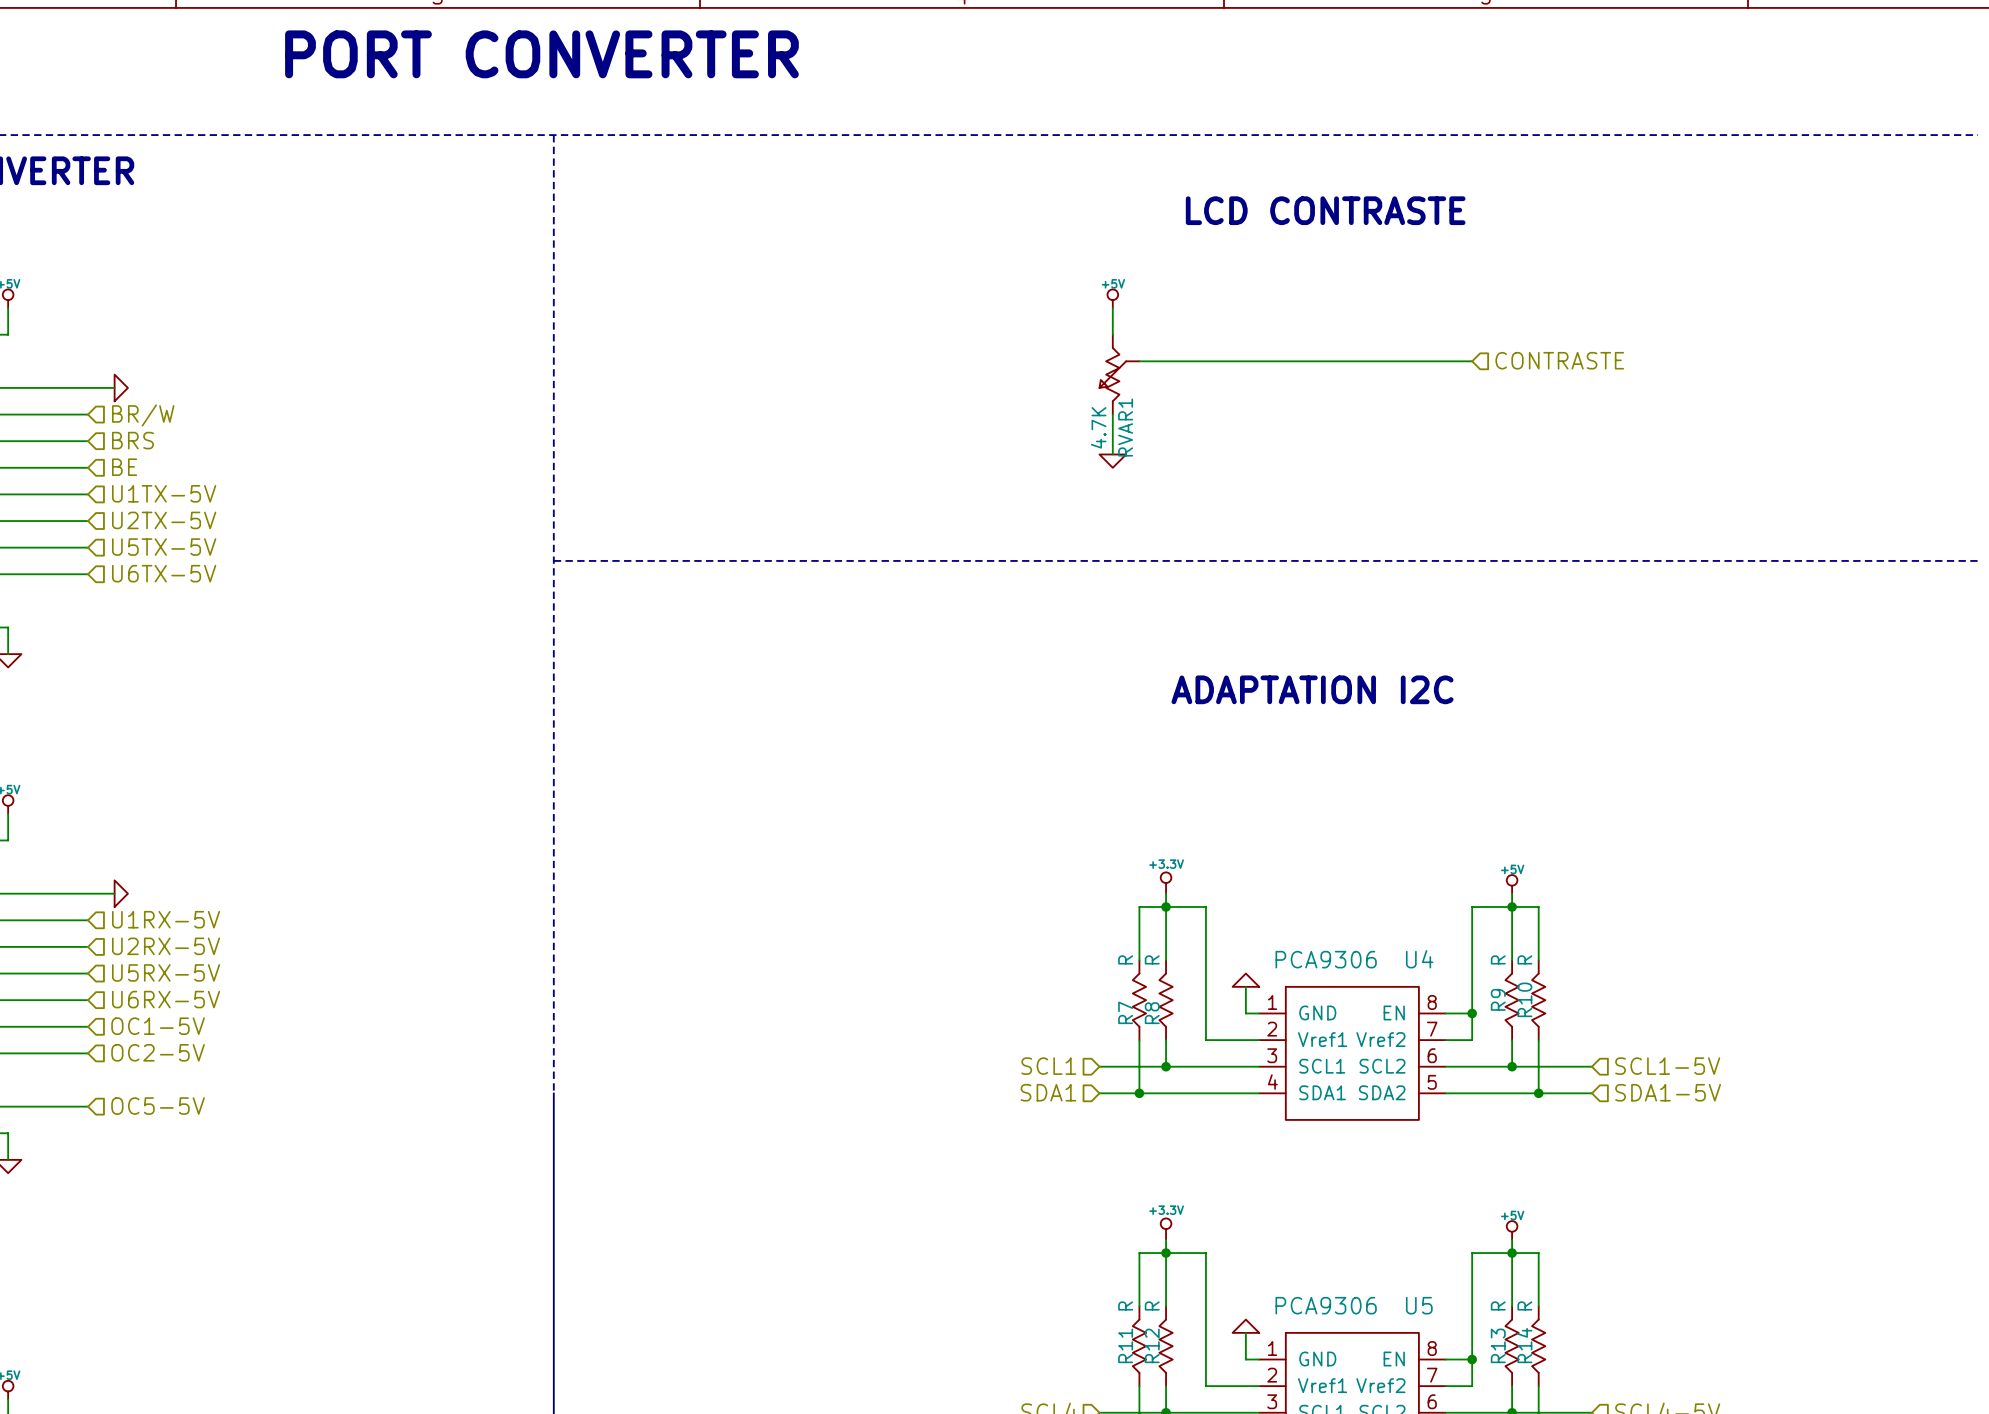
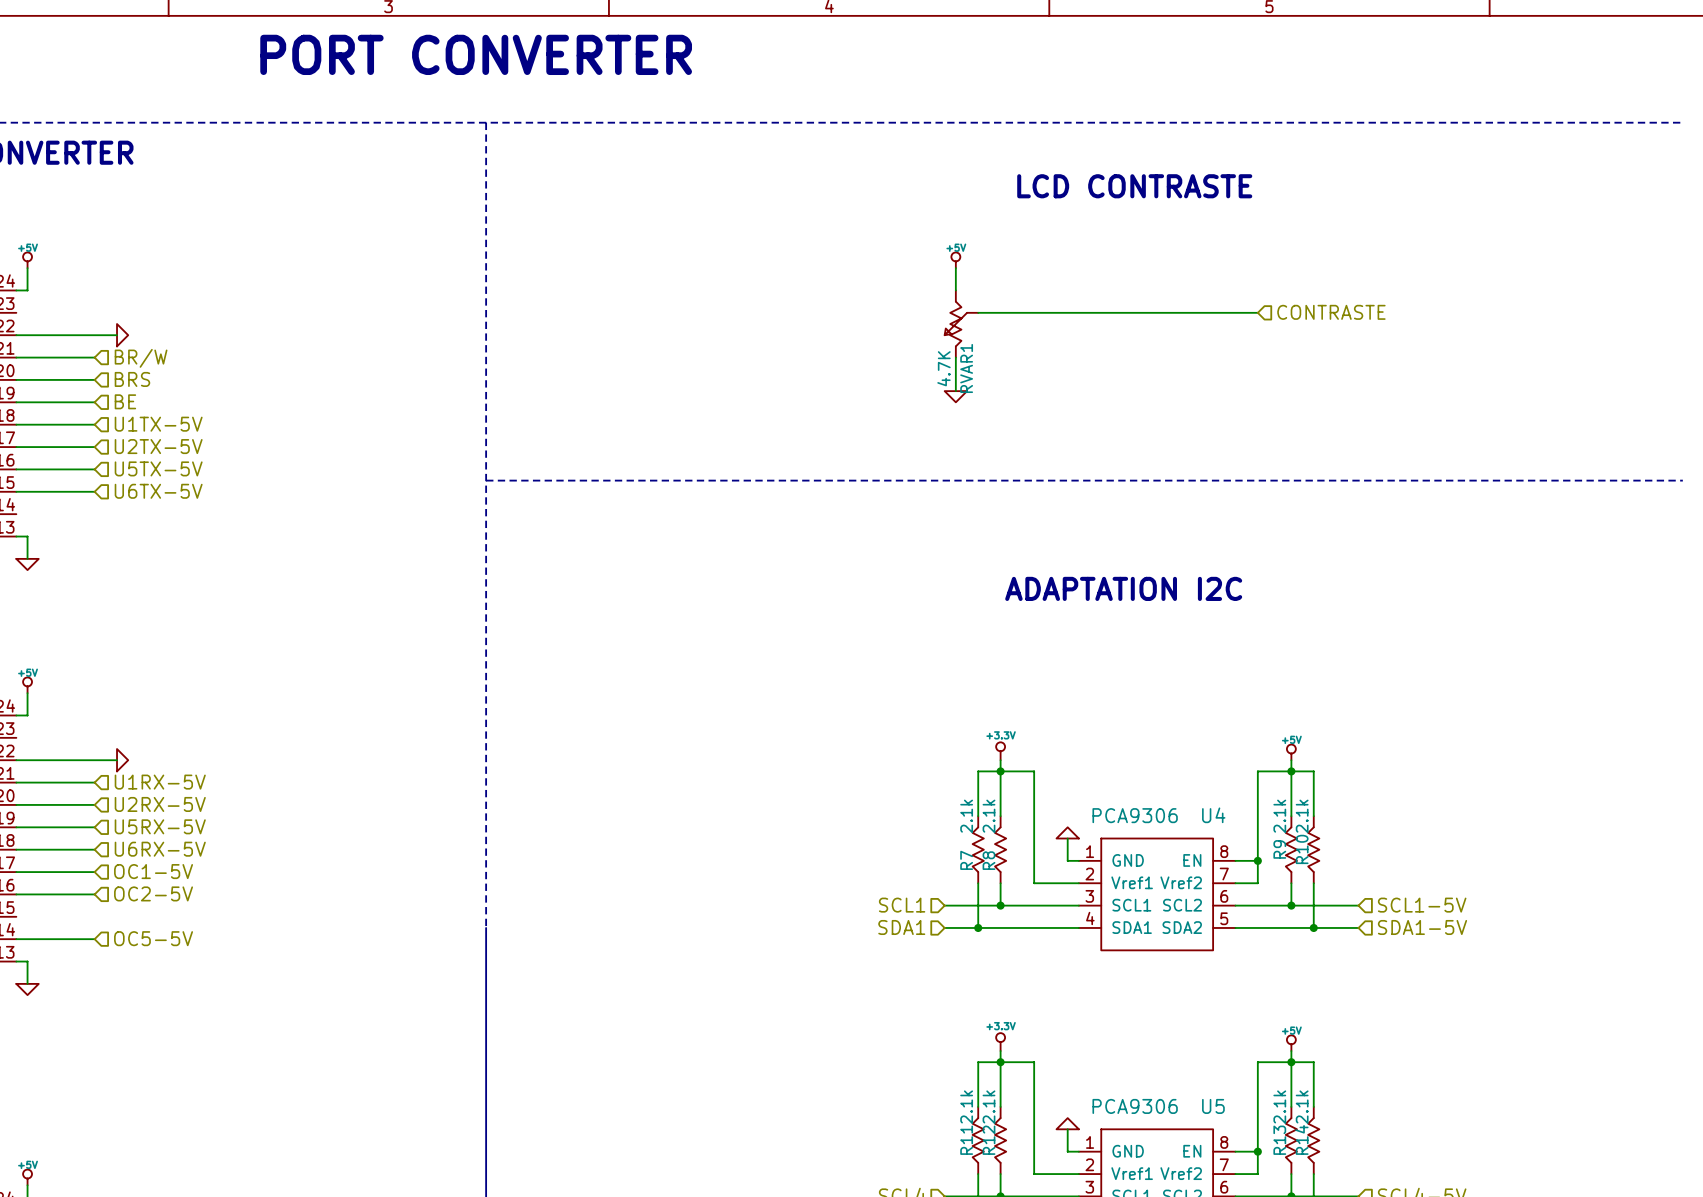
R7 value: R (1125, 959) -> 2.1k (966, 816)
R8 value: R (1152, 959) -> 2.1k (988, 816)
R9 value: R (1498, 959) -> 2.1k (1279, 816)
R10 value: R (1524, 959) -> 2.1k (1302, 816)
R11 value: R (1125, 1305) -> 2.1k (966, 1107)
R12 value: R (1152, 1305) -> 2.1k (988, 1107)
R13 value: R (1498, 1305) -> 2.1k (1279, 1107)
R14 value: R (1524, 1305) -> 2.1k (1302, 1107)

